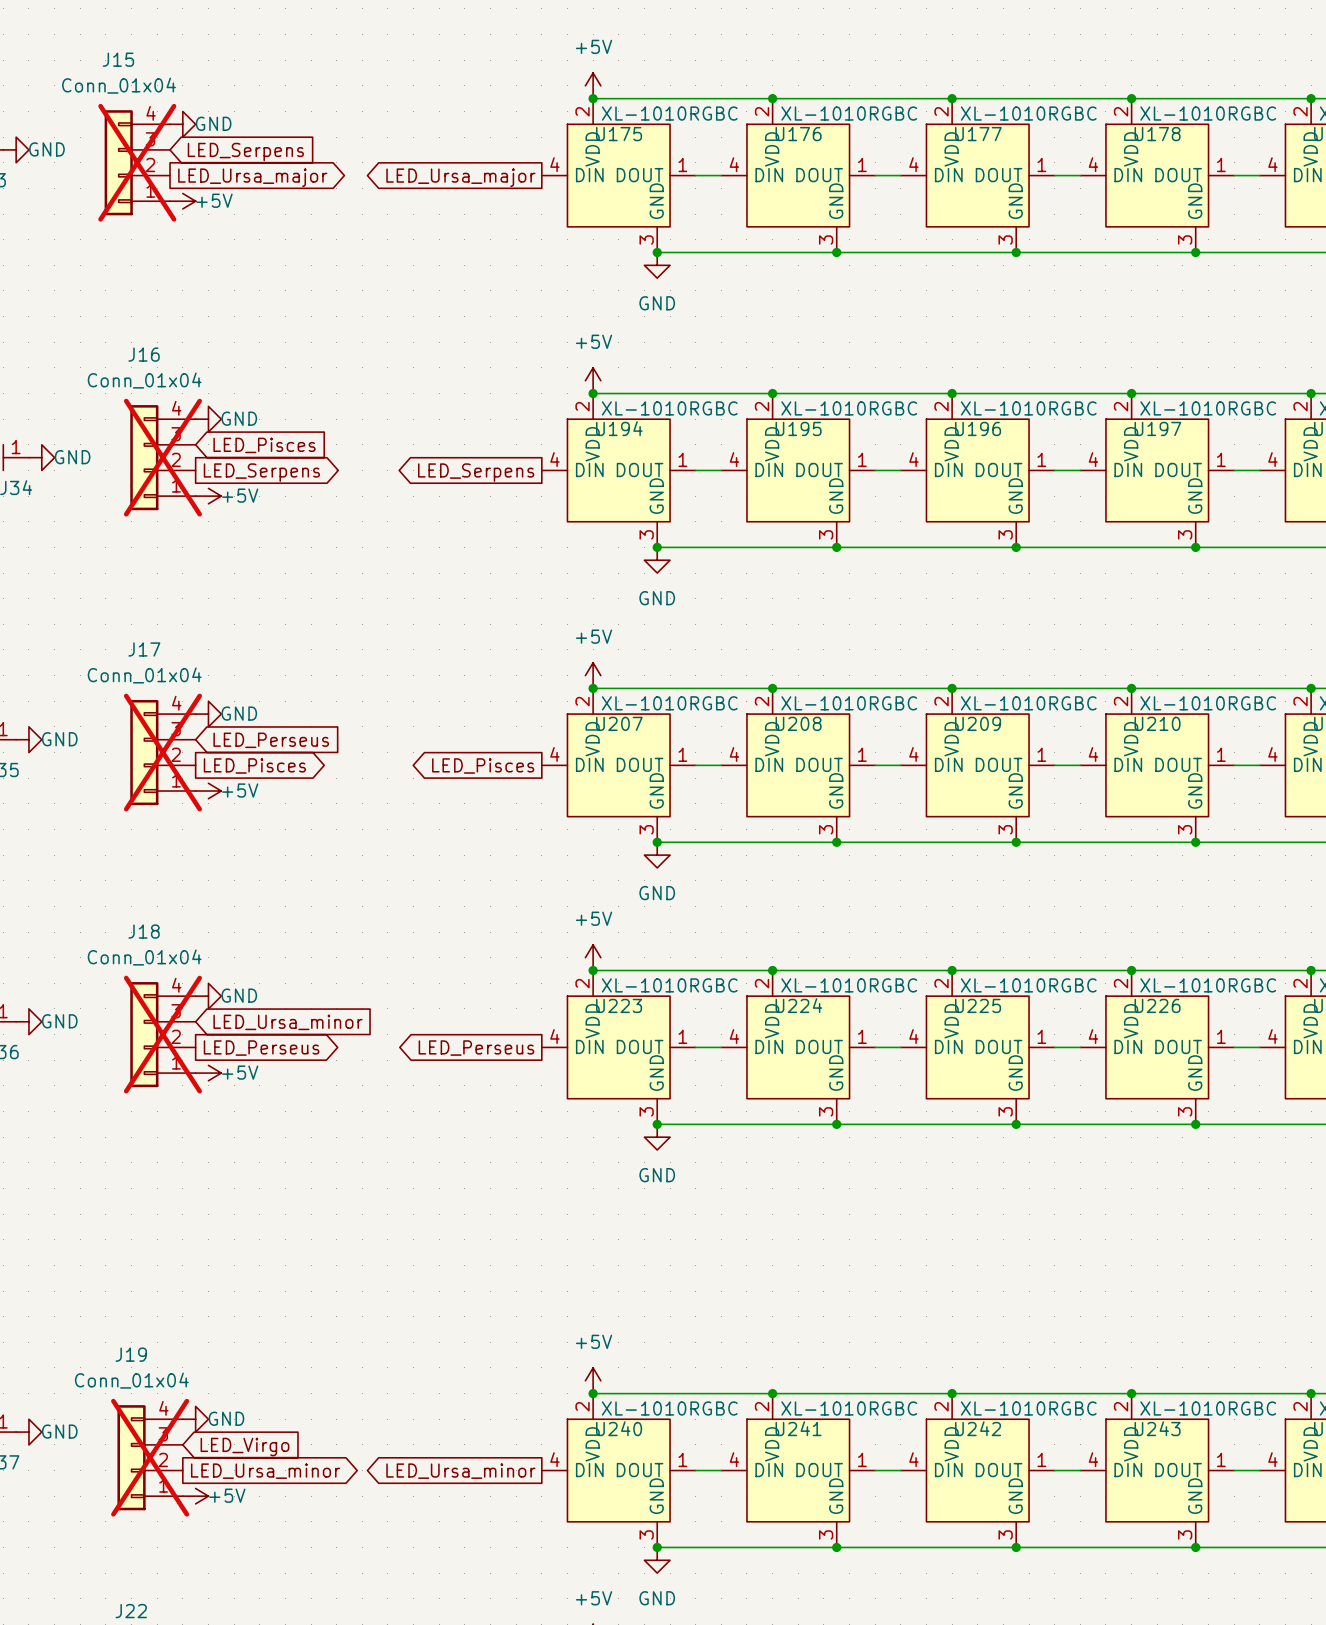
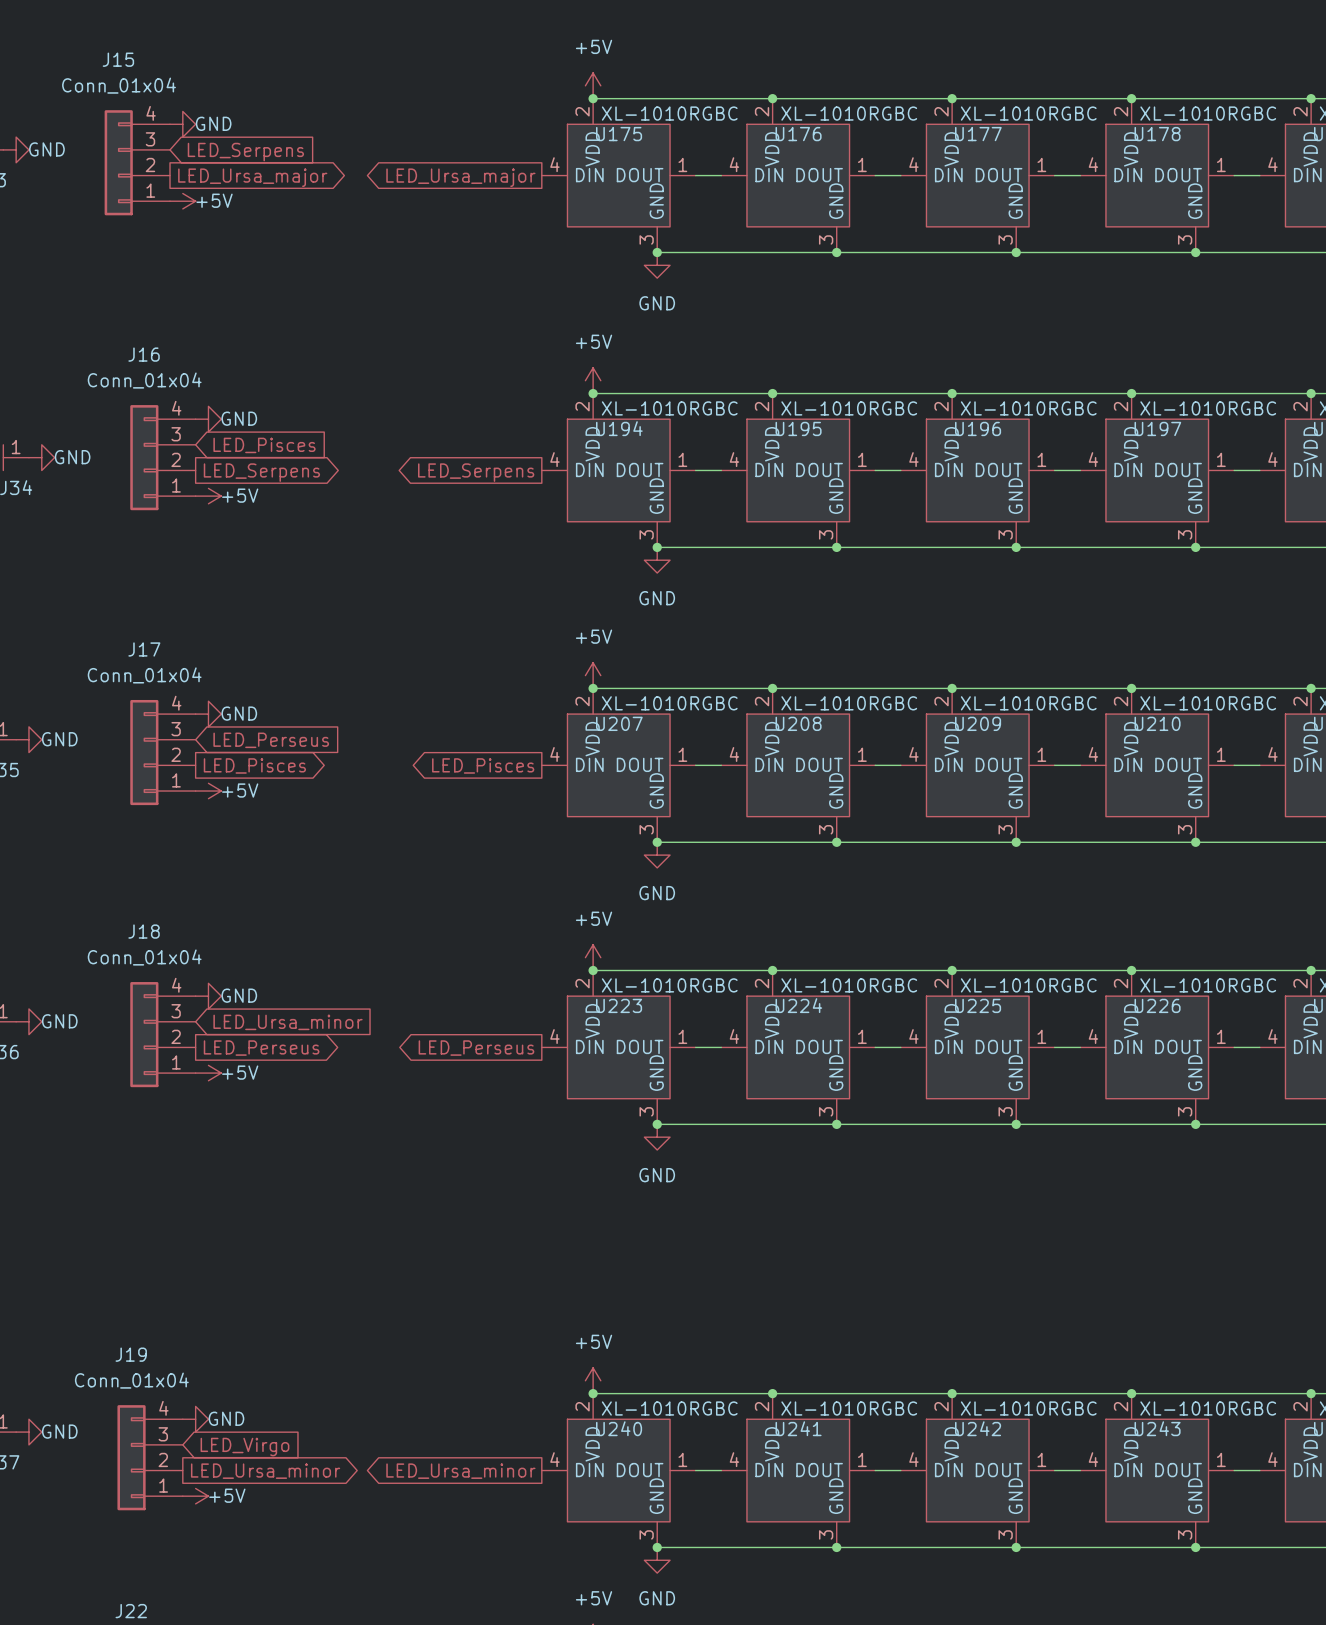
J15 do-not-place cross: (137, 162) -> none
J16 do-not-place cross: (162, 457) -> none
J17 do-not-place cross: (162, 752) -> none
J18 do-not-place cross: (162, 1034) -> none
J19 do-not-place cross: (150, 1457) -> none

